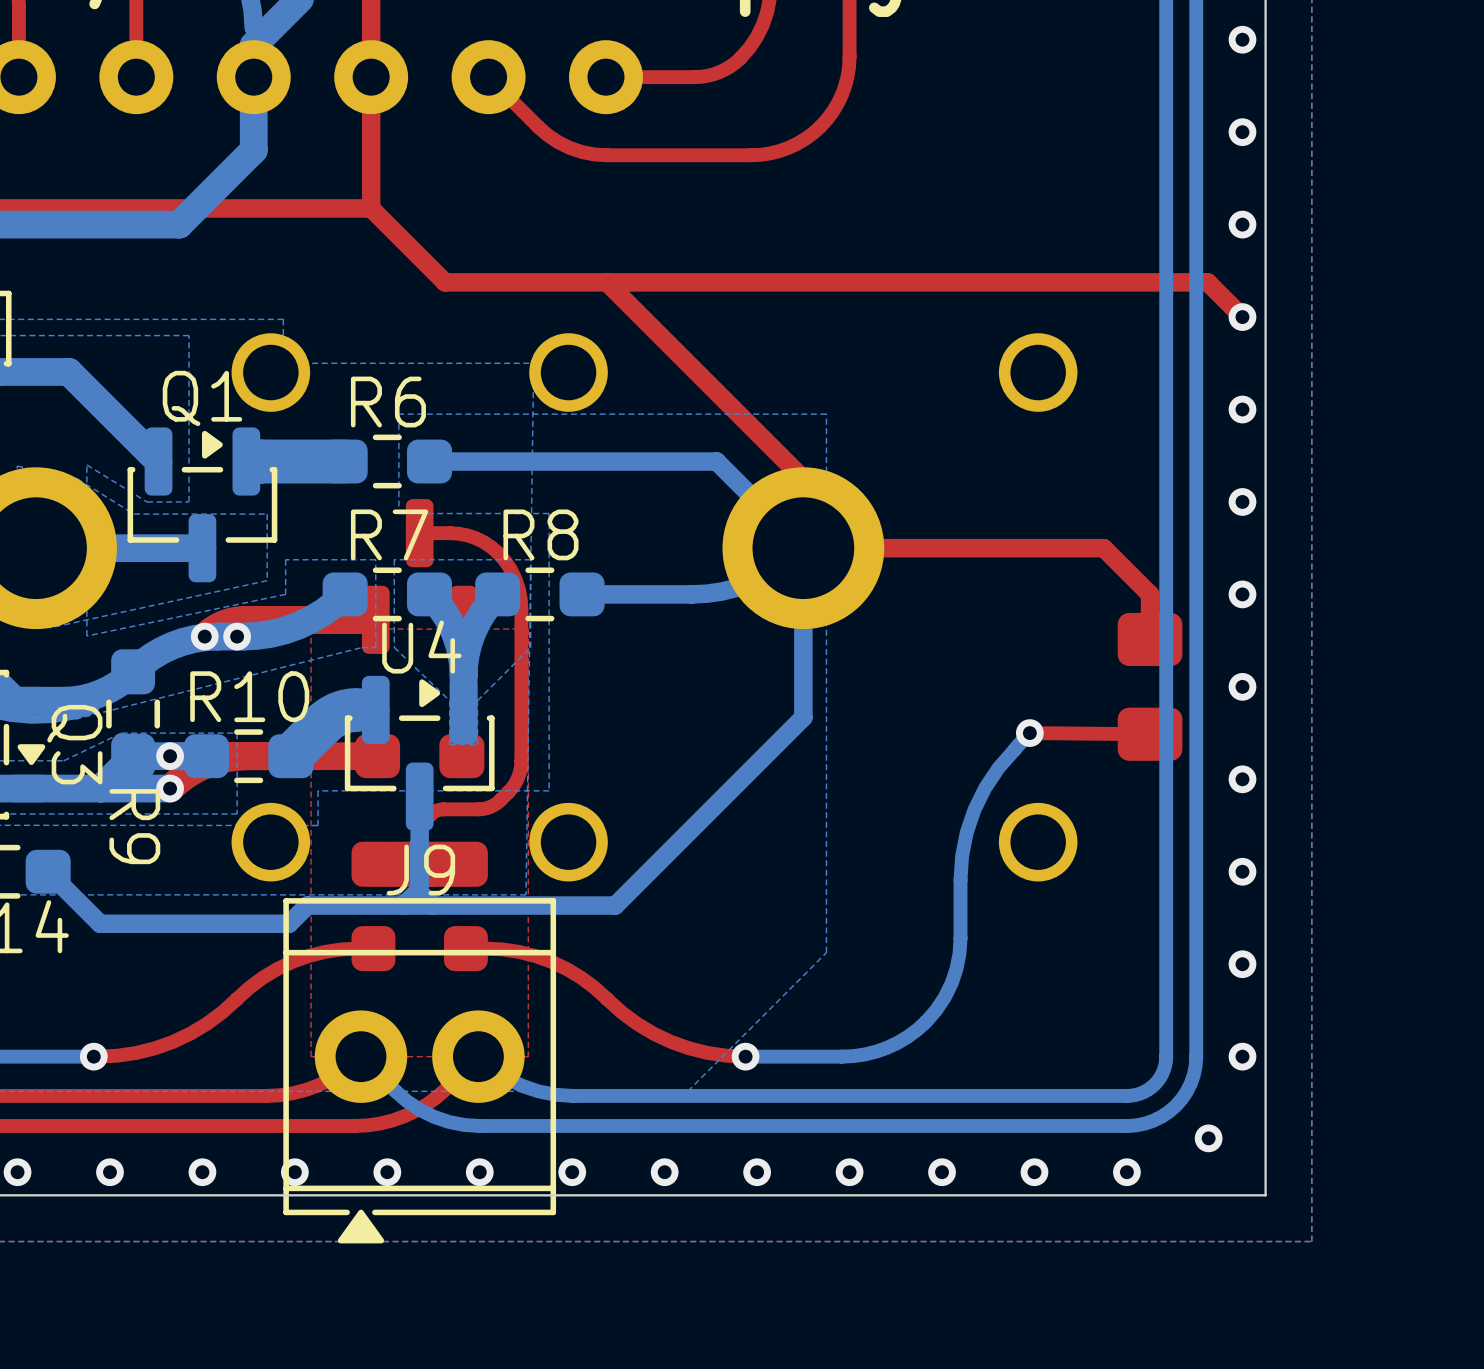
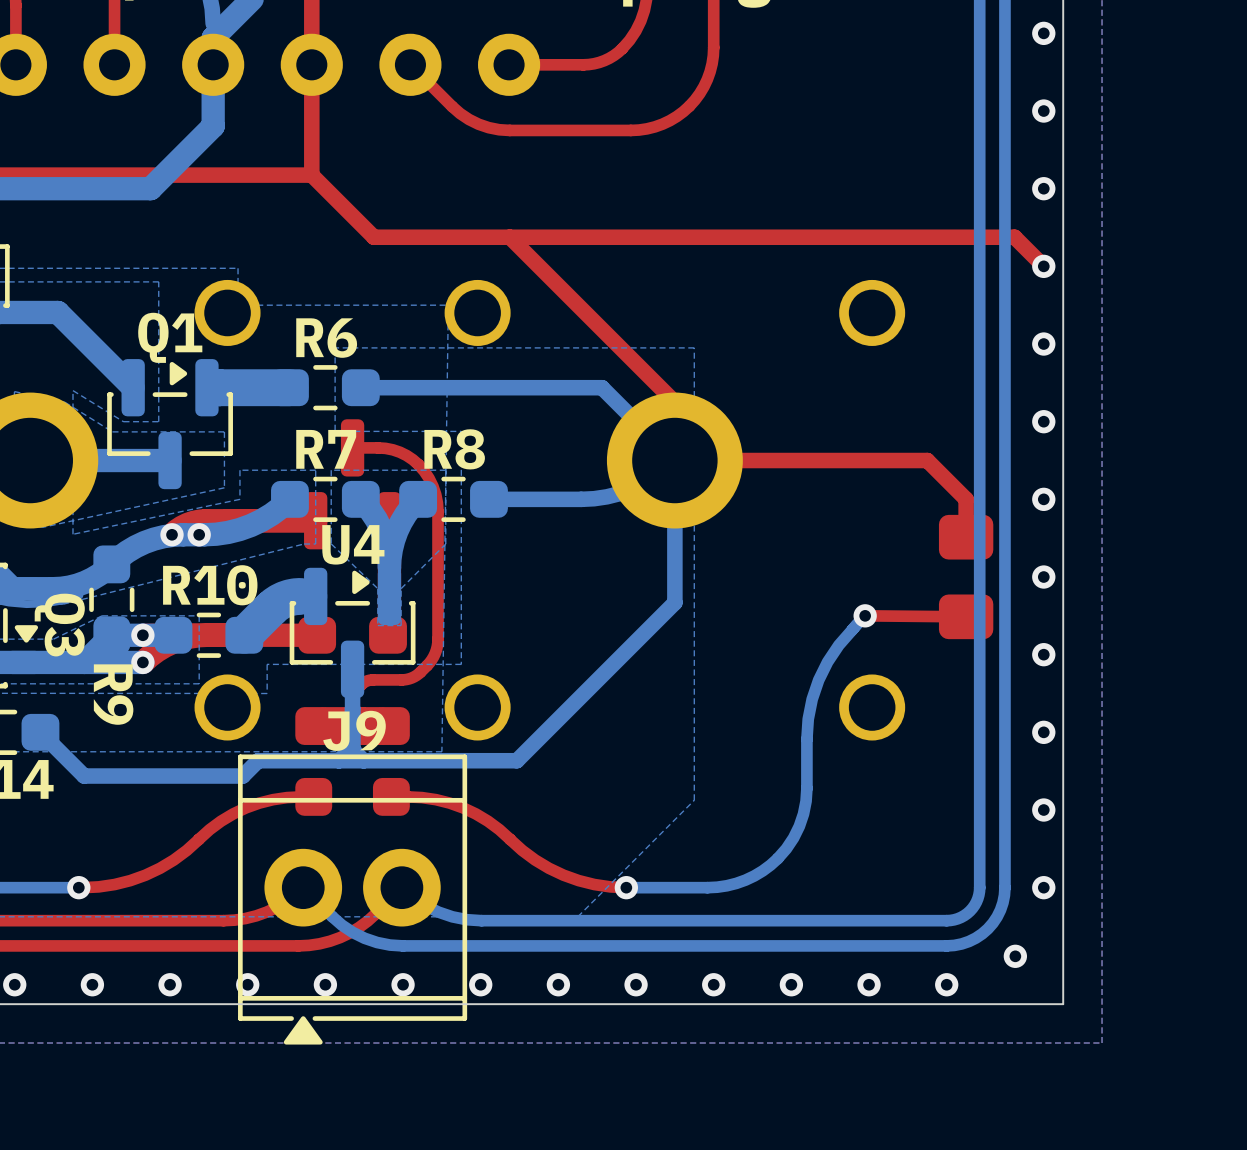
top zone outline: (528, 629) (528, 1056) (311, 1056) (311, 629) (528, 629) -> none

